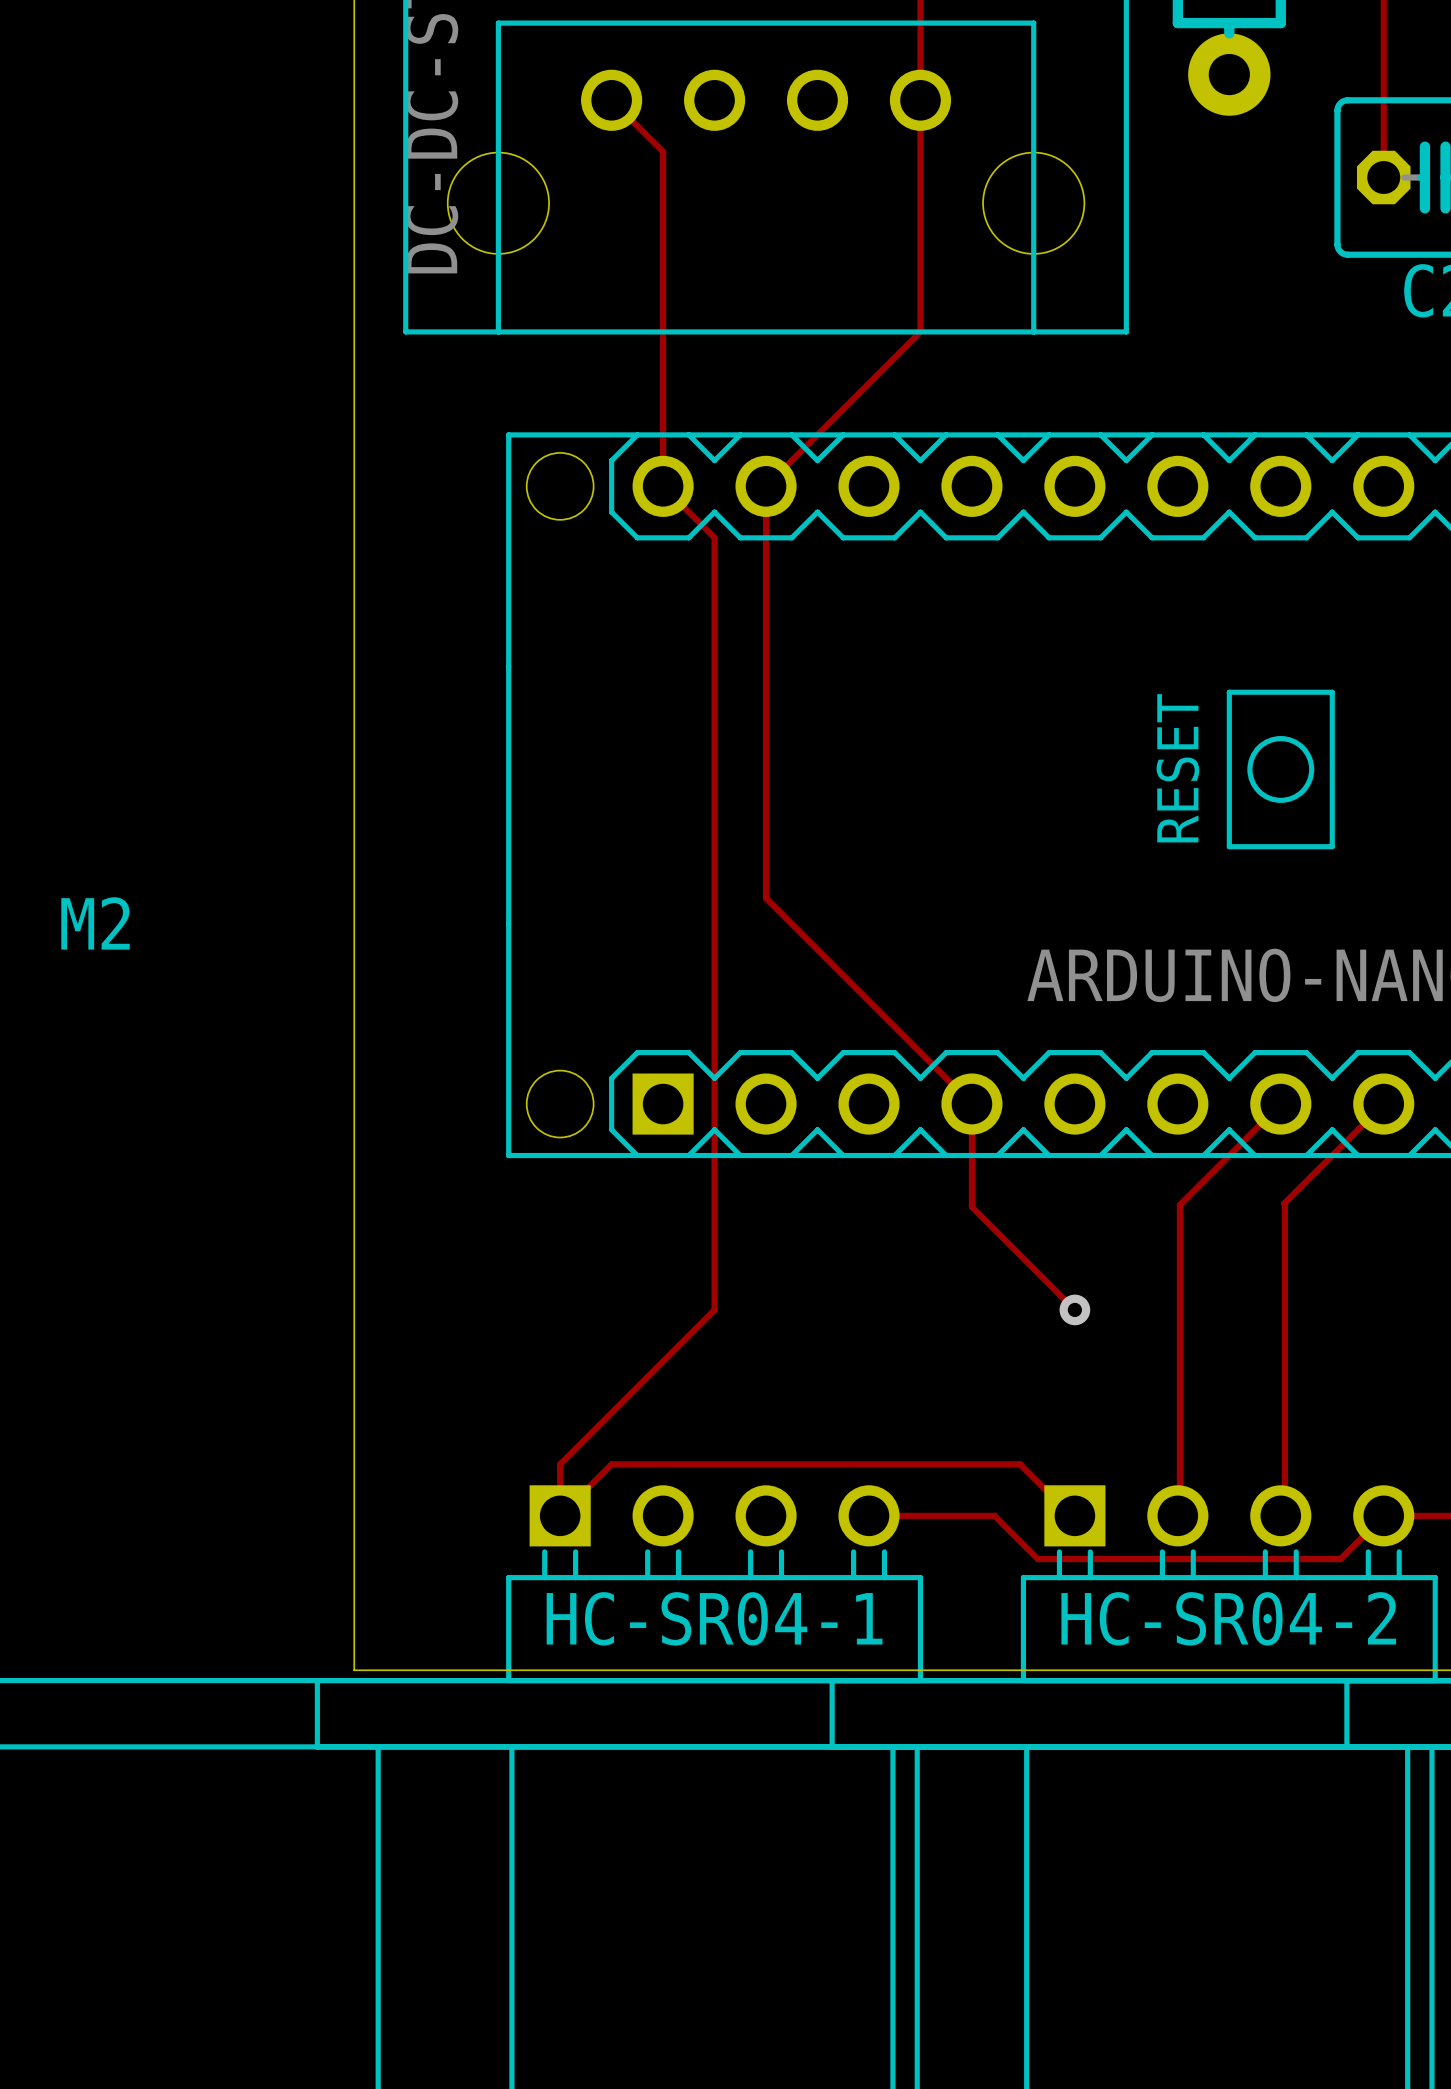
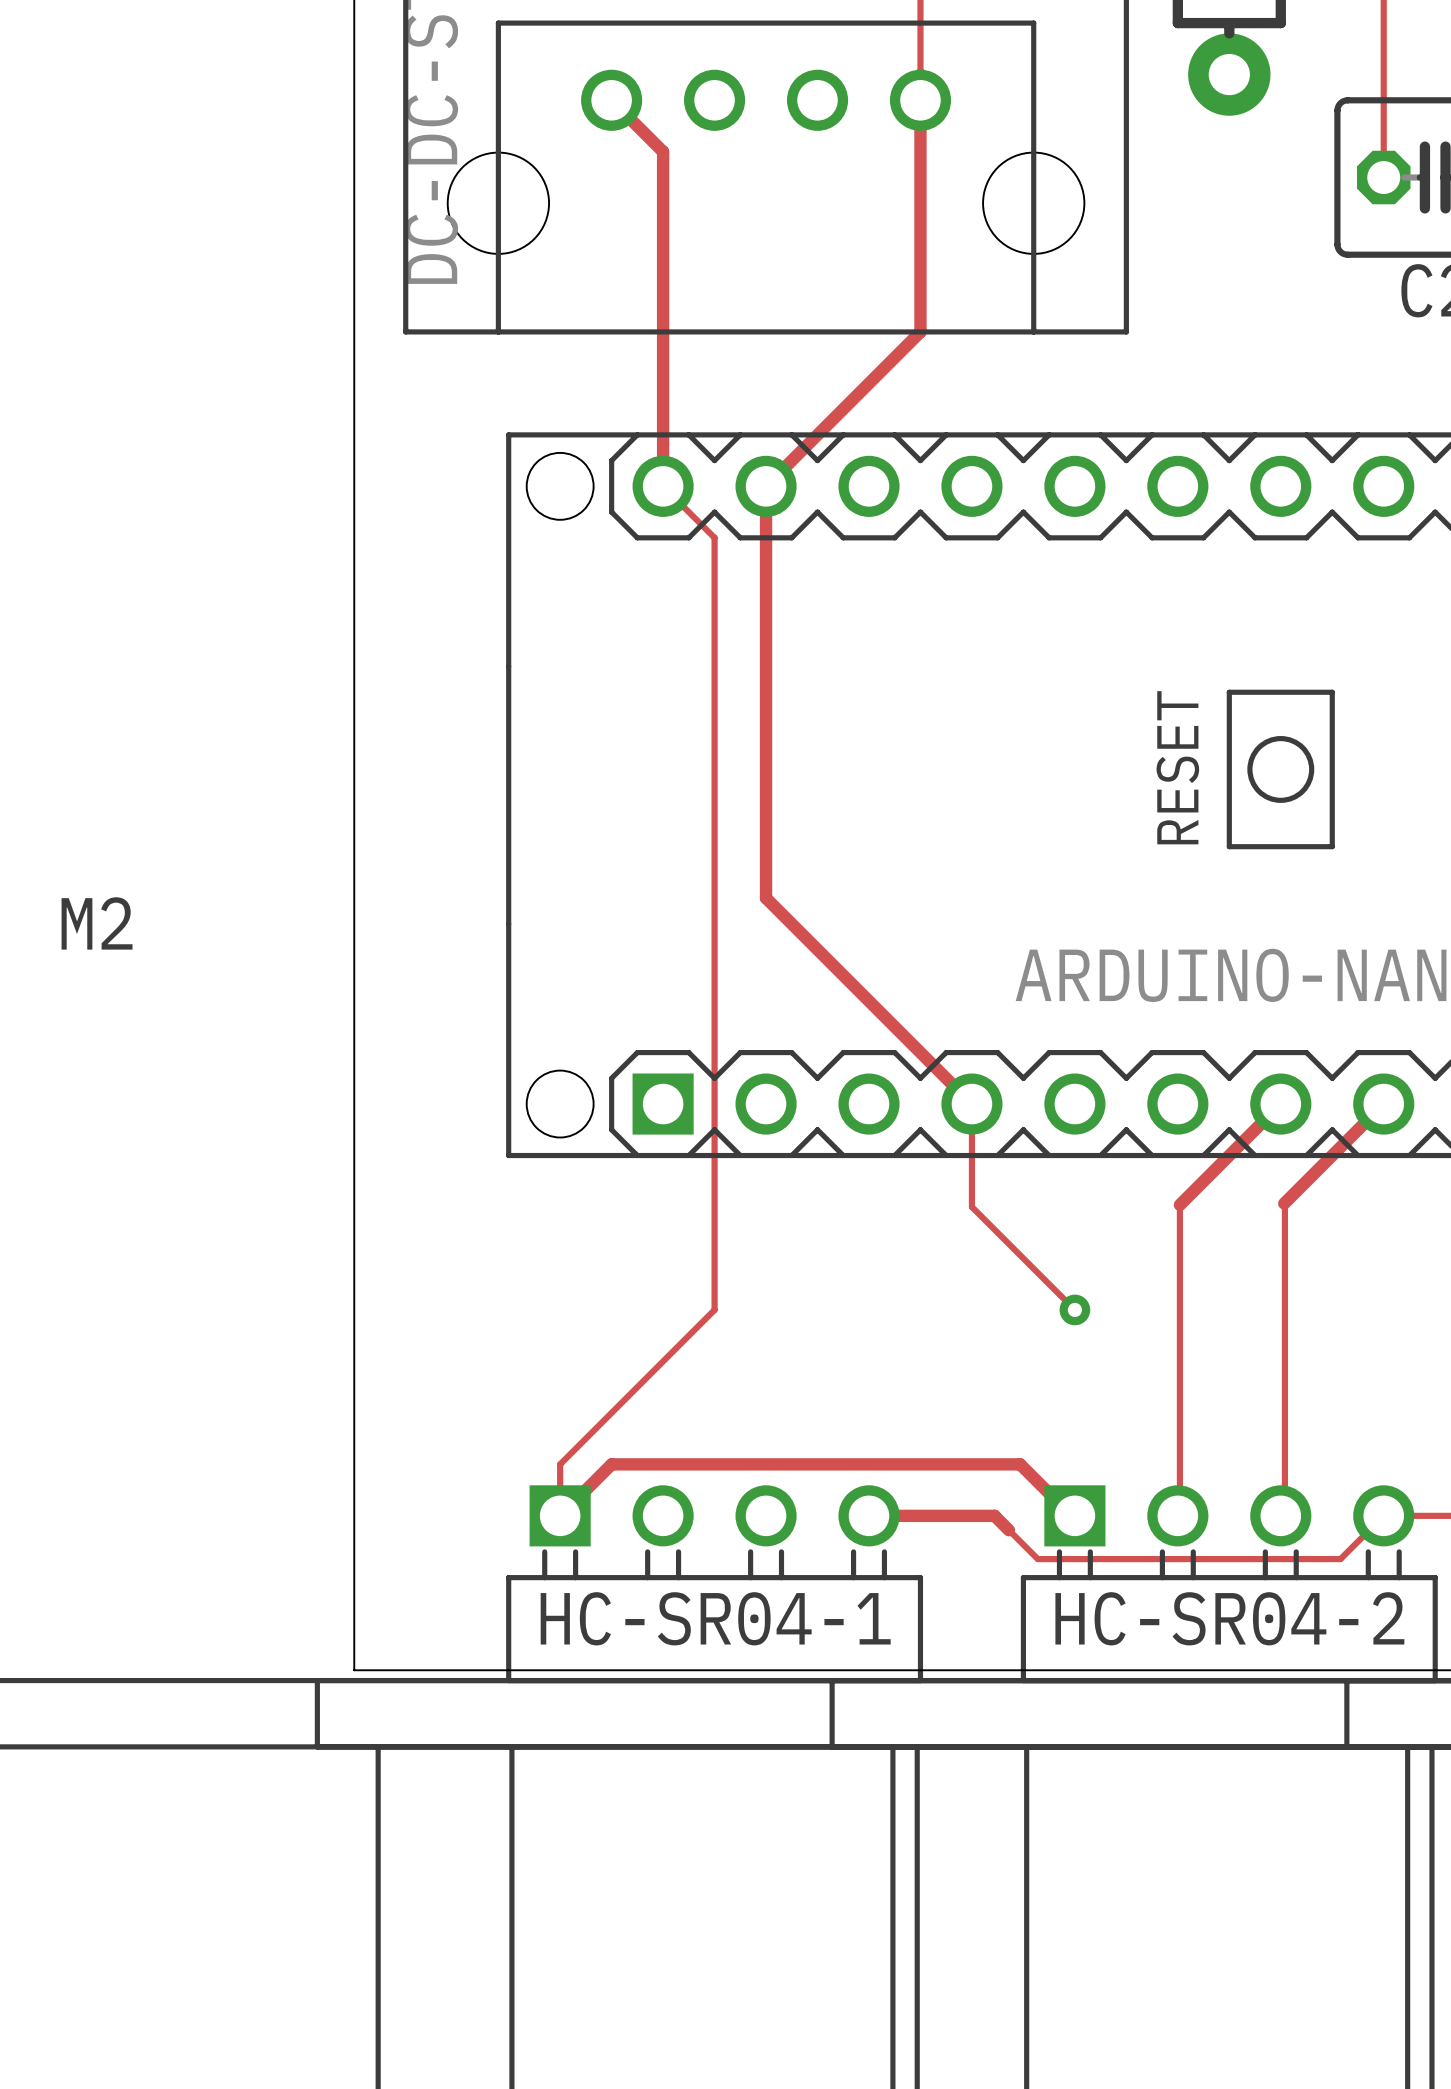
track width: thin (920, 74) (920, 331) (766, 486) (766, 898) (971, 1104) -> thick (920, 74) (920, 331) (766, 486) (766, 898) (971, 1104)
track width: thin (611, 100) (663, 151) (663, 486) -> thick (611, 100) (663, 151) (663, 486)
track width: thin (1280, 1104) (1179, 1204) -> thick (1280, 1104) (1179, 1204)
track width: thin (1383, 1104) (1284, 1203) -> thick (1383, 1104) (1284, 1203)
track width: thin (1070, 1514) (1020, 1464) (611, 1464) (560, 1515) -> thick (1070, 1514) (1020, 1464) (611, 1464) (560, 1515)
track width: thin (869, 1515) (994, 1515) (1009, 1530) -> thick (869, 1515) (994, 1515) (1009, 1530)

